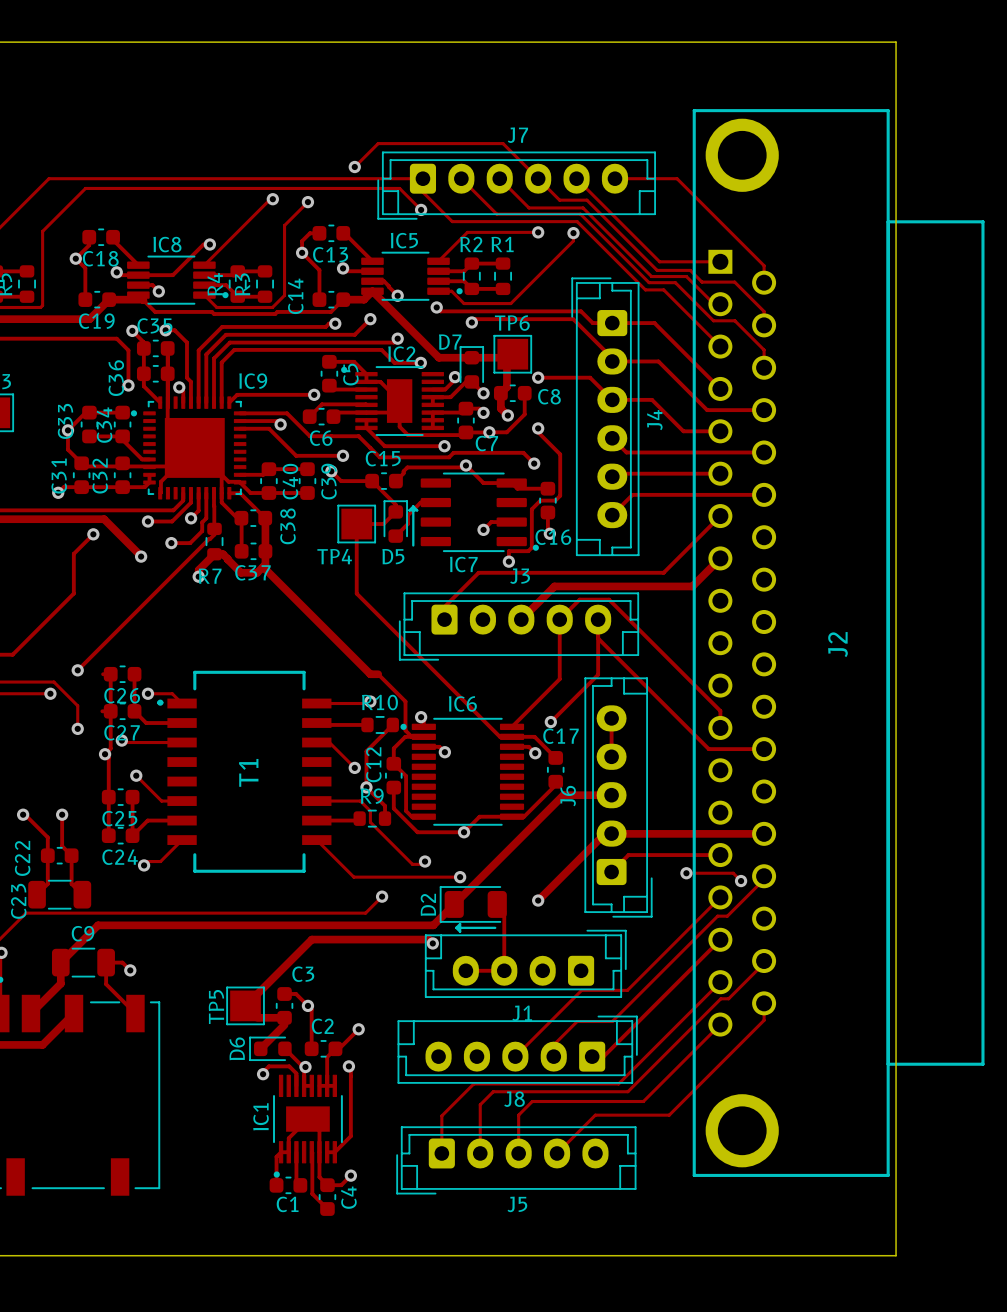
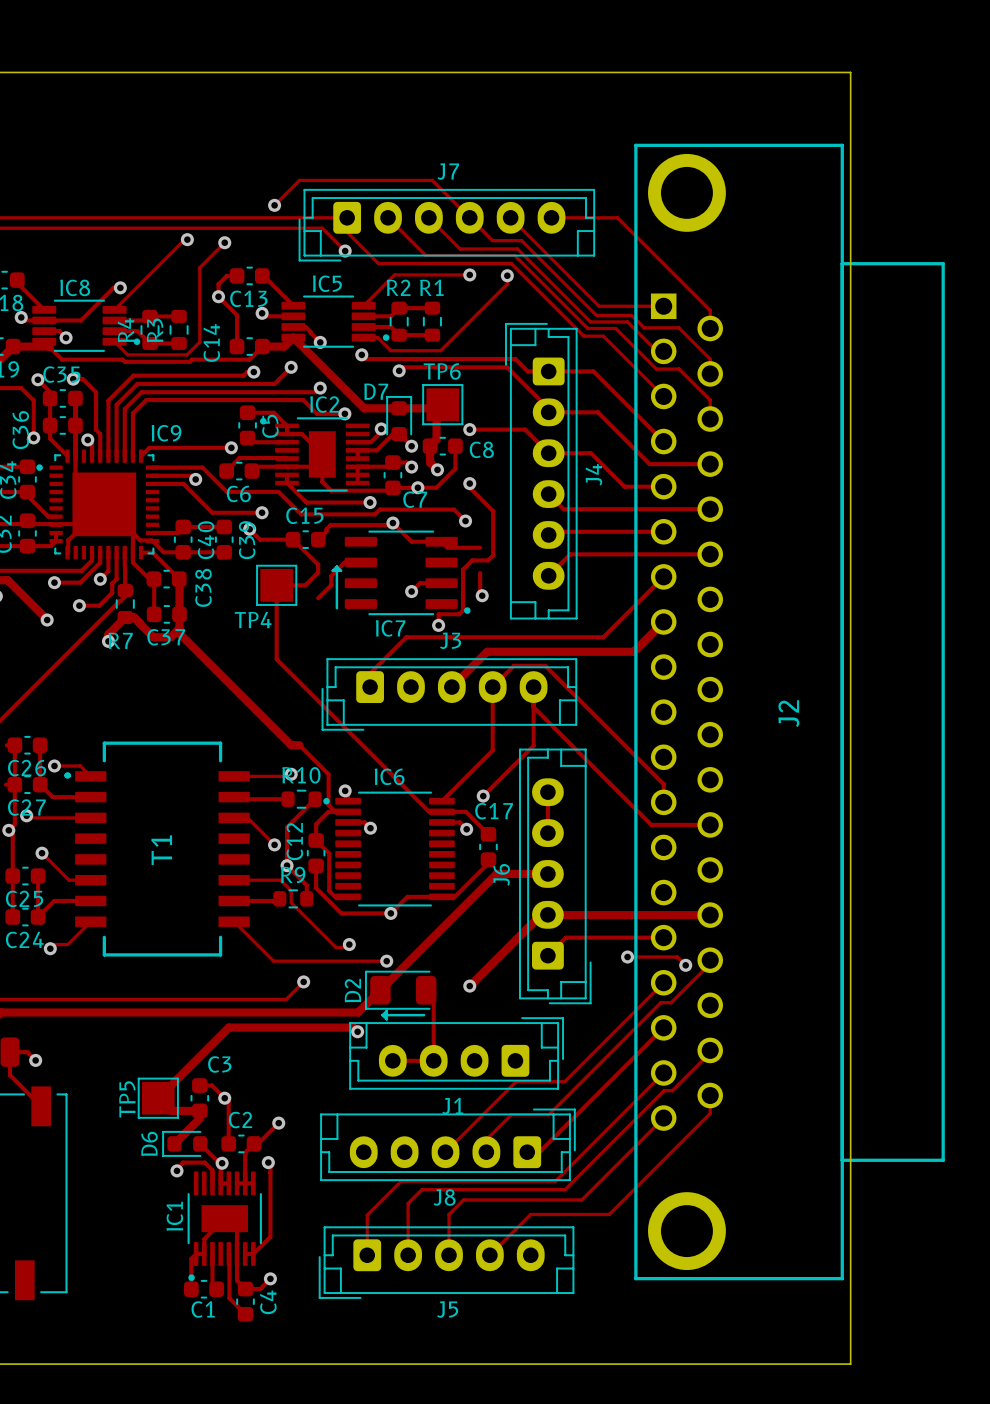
C16: (547, 500) -> none
D5: (395, 521) -> none

